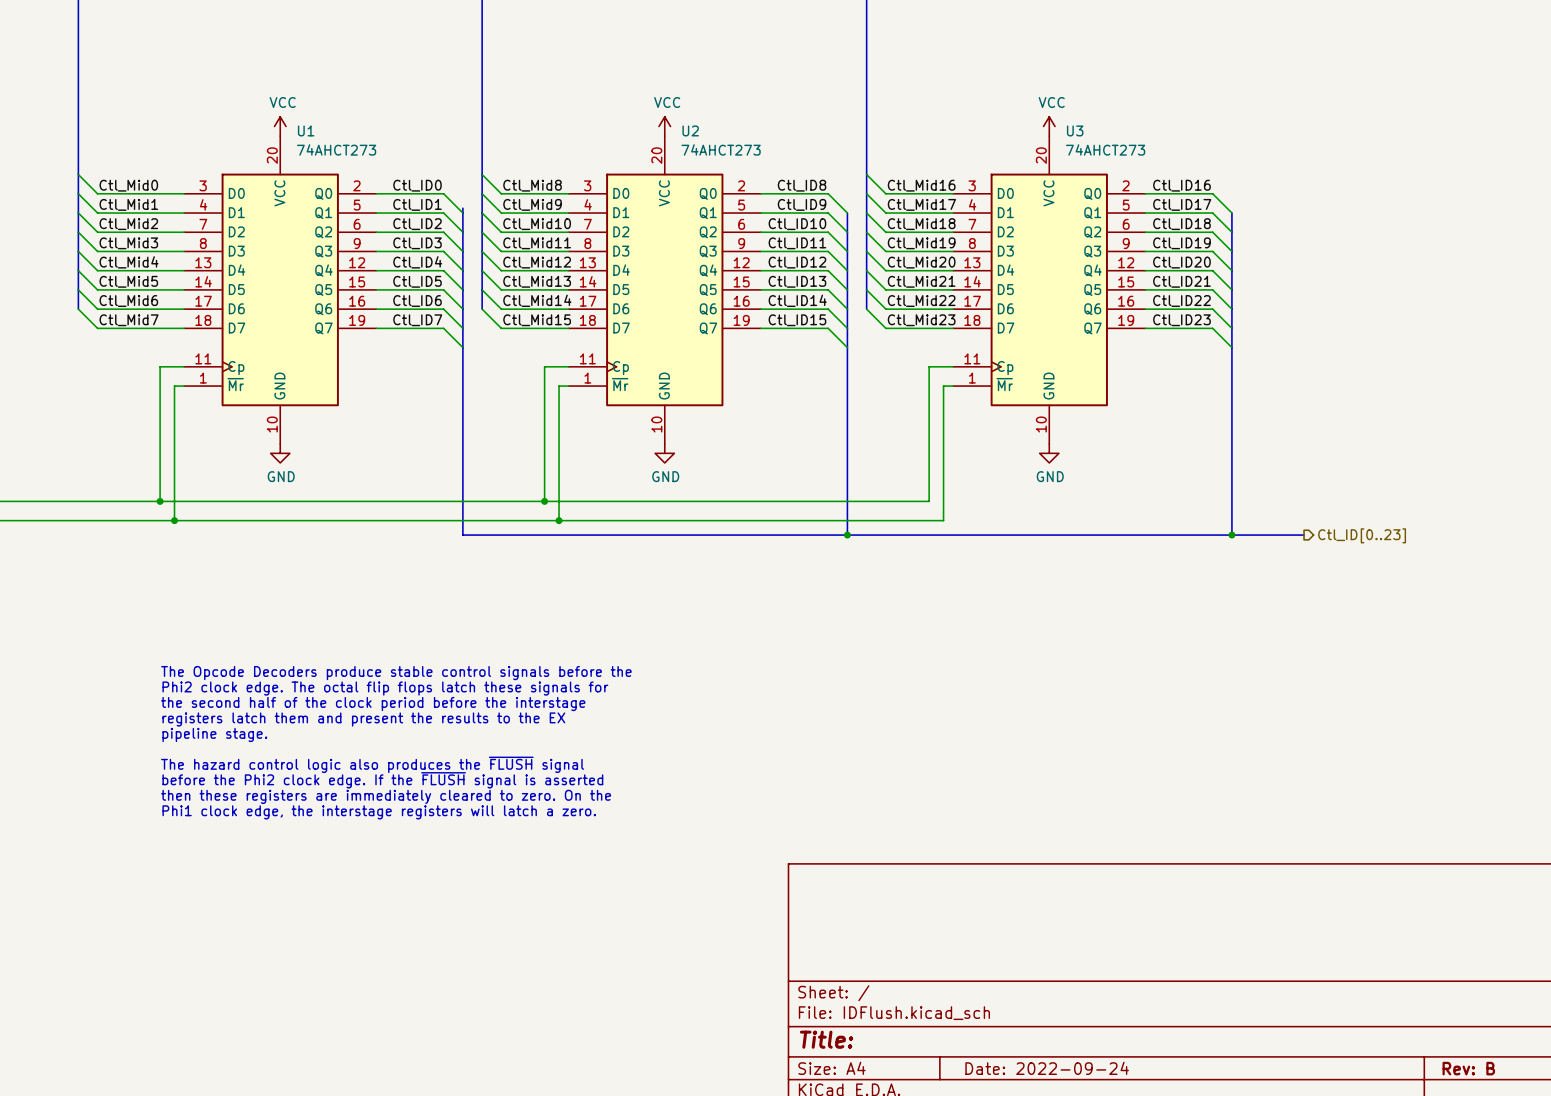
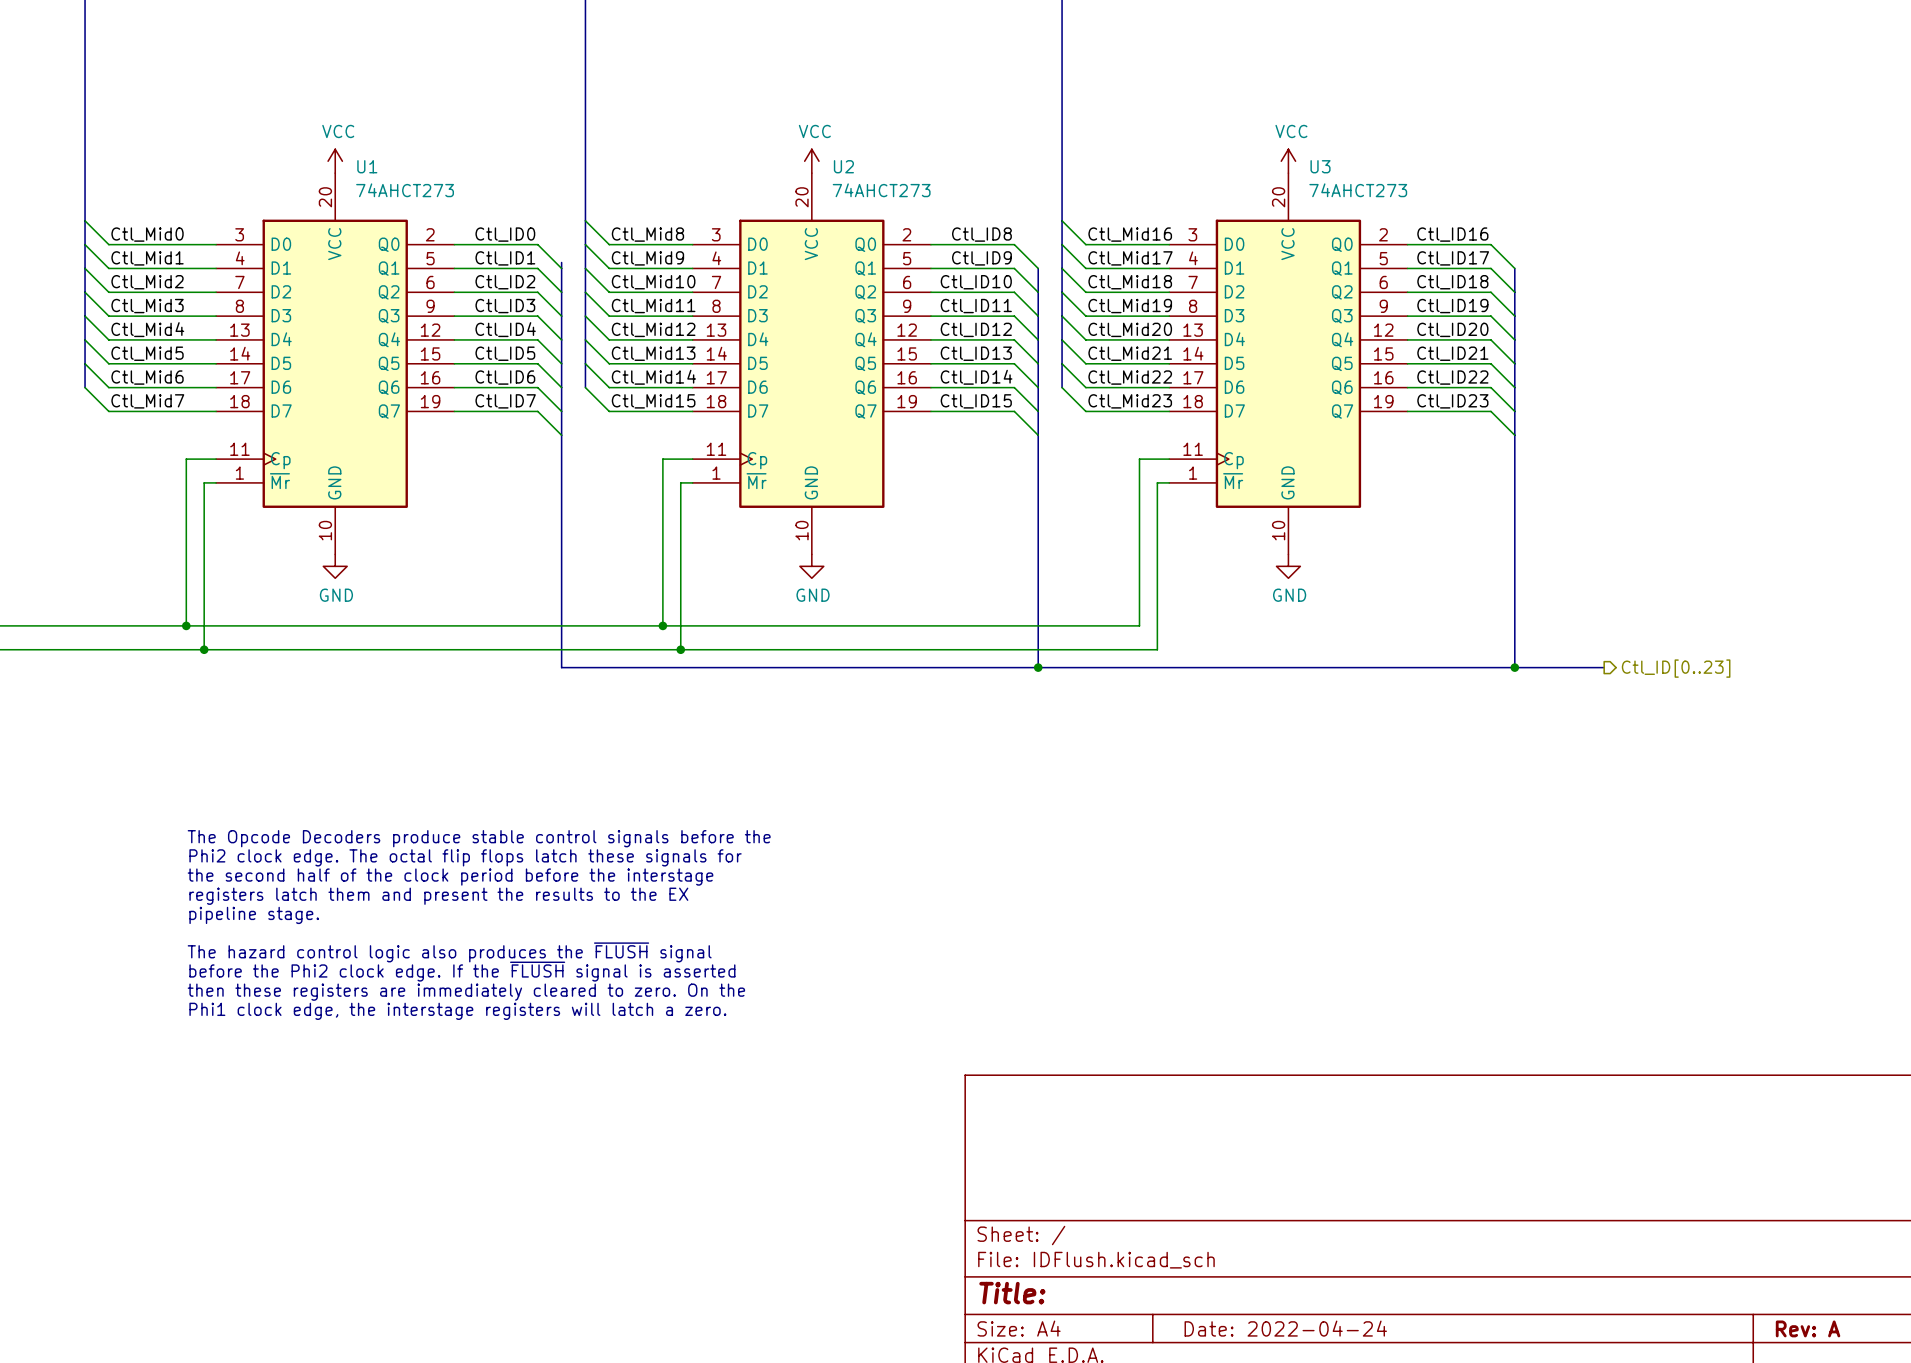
title block: Date: 2022-09-24 (1047, 1068) -> Date: 2022-04-24 (1285, 1328)
title block: Rev: B (1468, 1068) -> Rev: A (1808, 1328)

